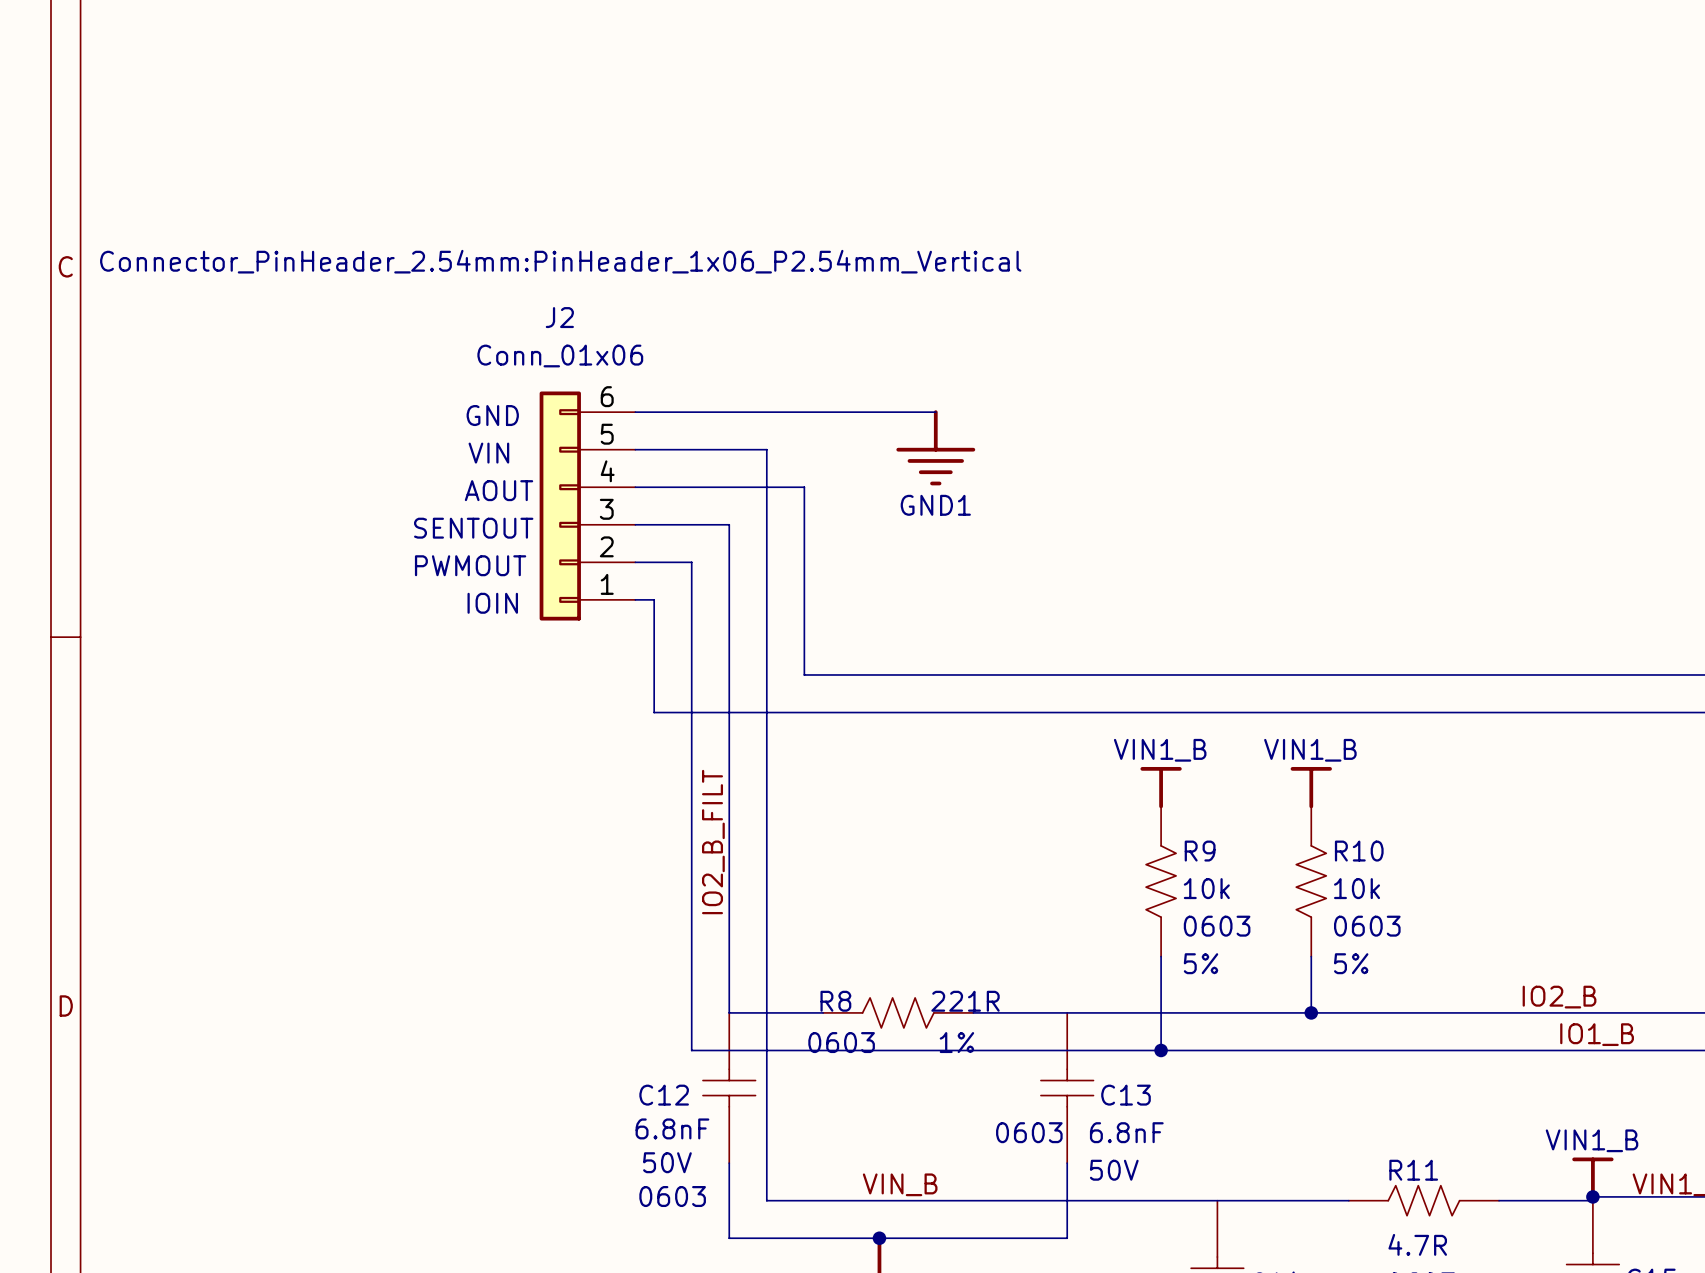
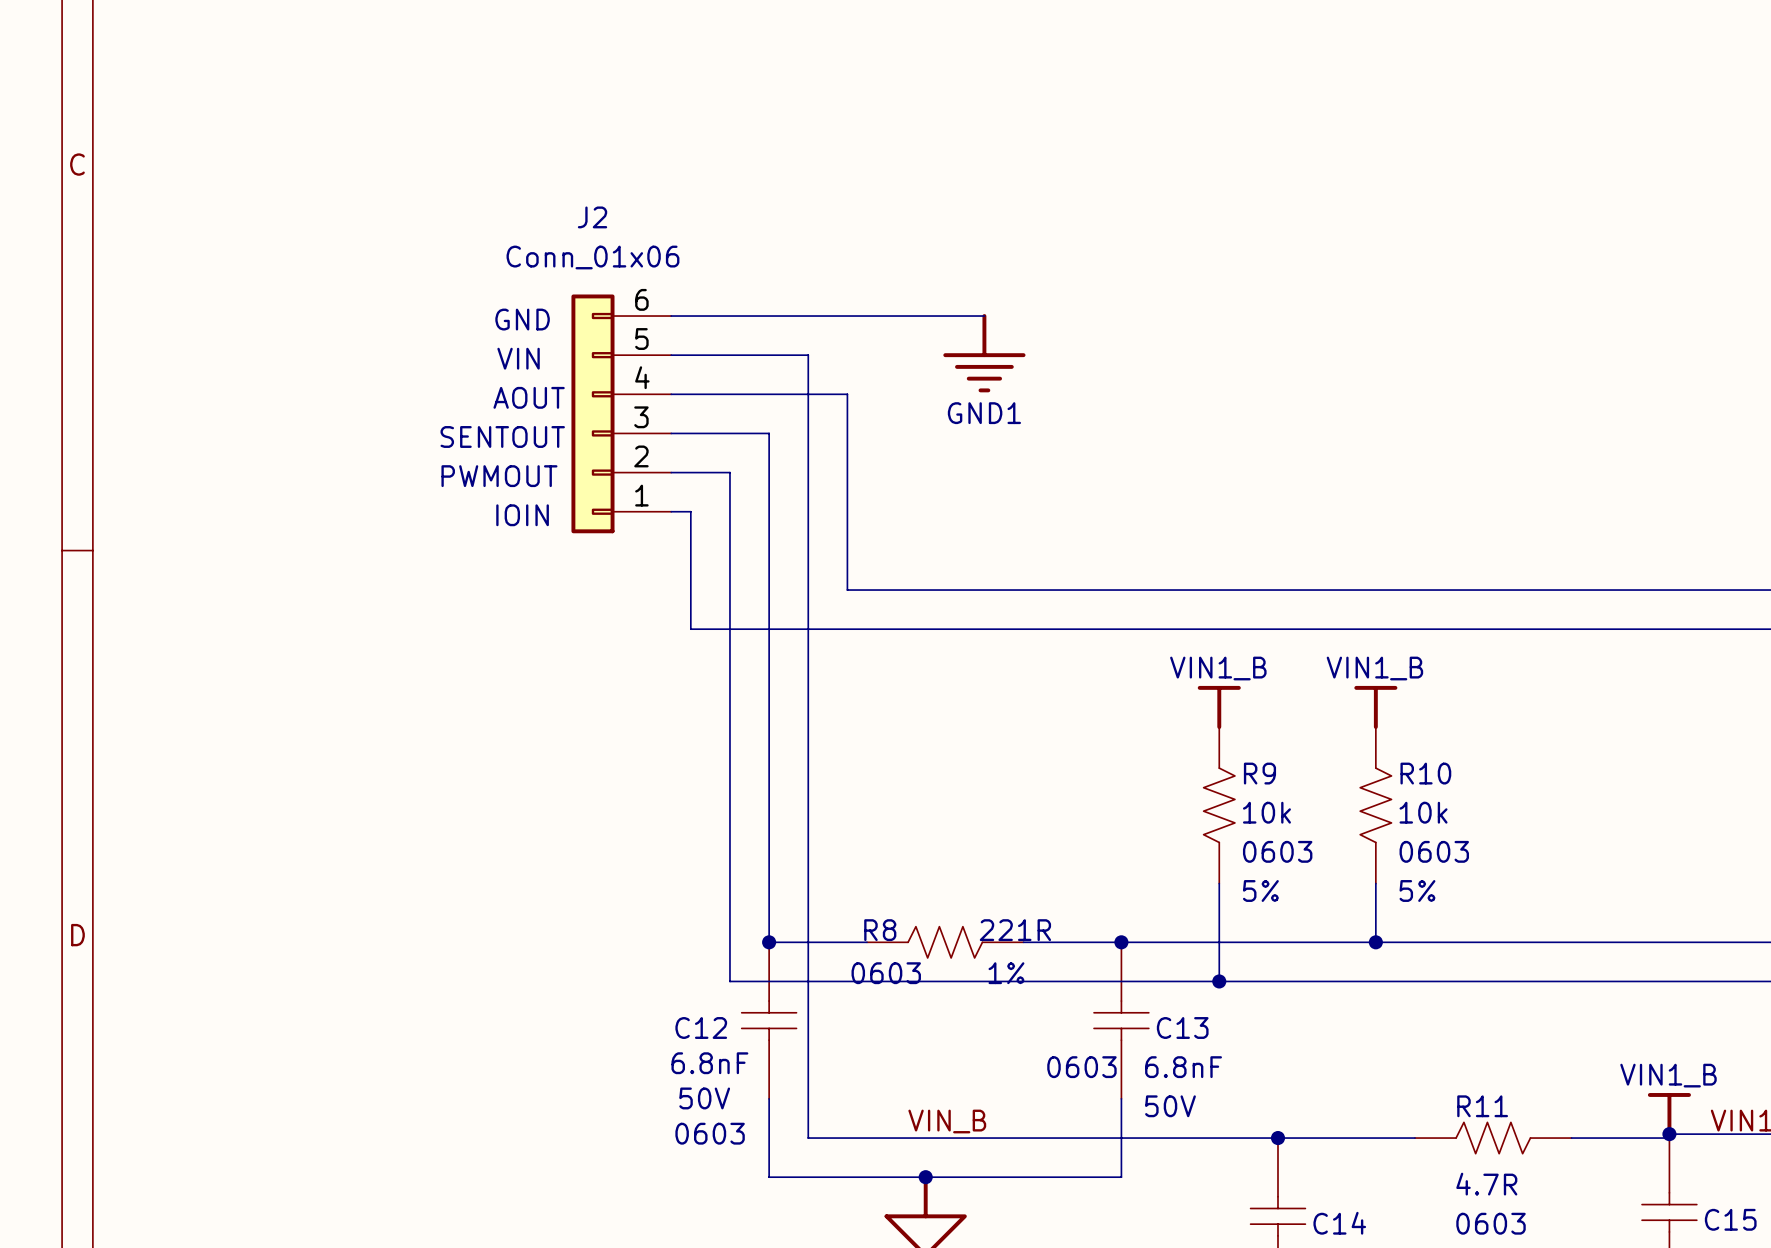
J2 text: Connector_PinHeader_2.54mm:PinHeader_1x06_P2.54mm_Vertical (560, 261) -> none
label: IO2_B_FILT (713, 842) -> none
label: IO2_B (1559, 997) -> none
junction: none -> (769, 942)
junction: none -> (1121, 942)
label: IO1_B (1597, 1034) -> none
junction: none -> (1277, 1138)

